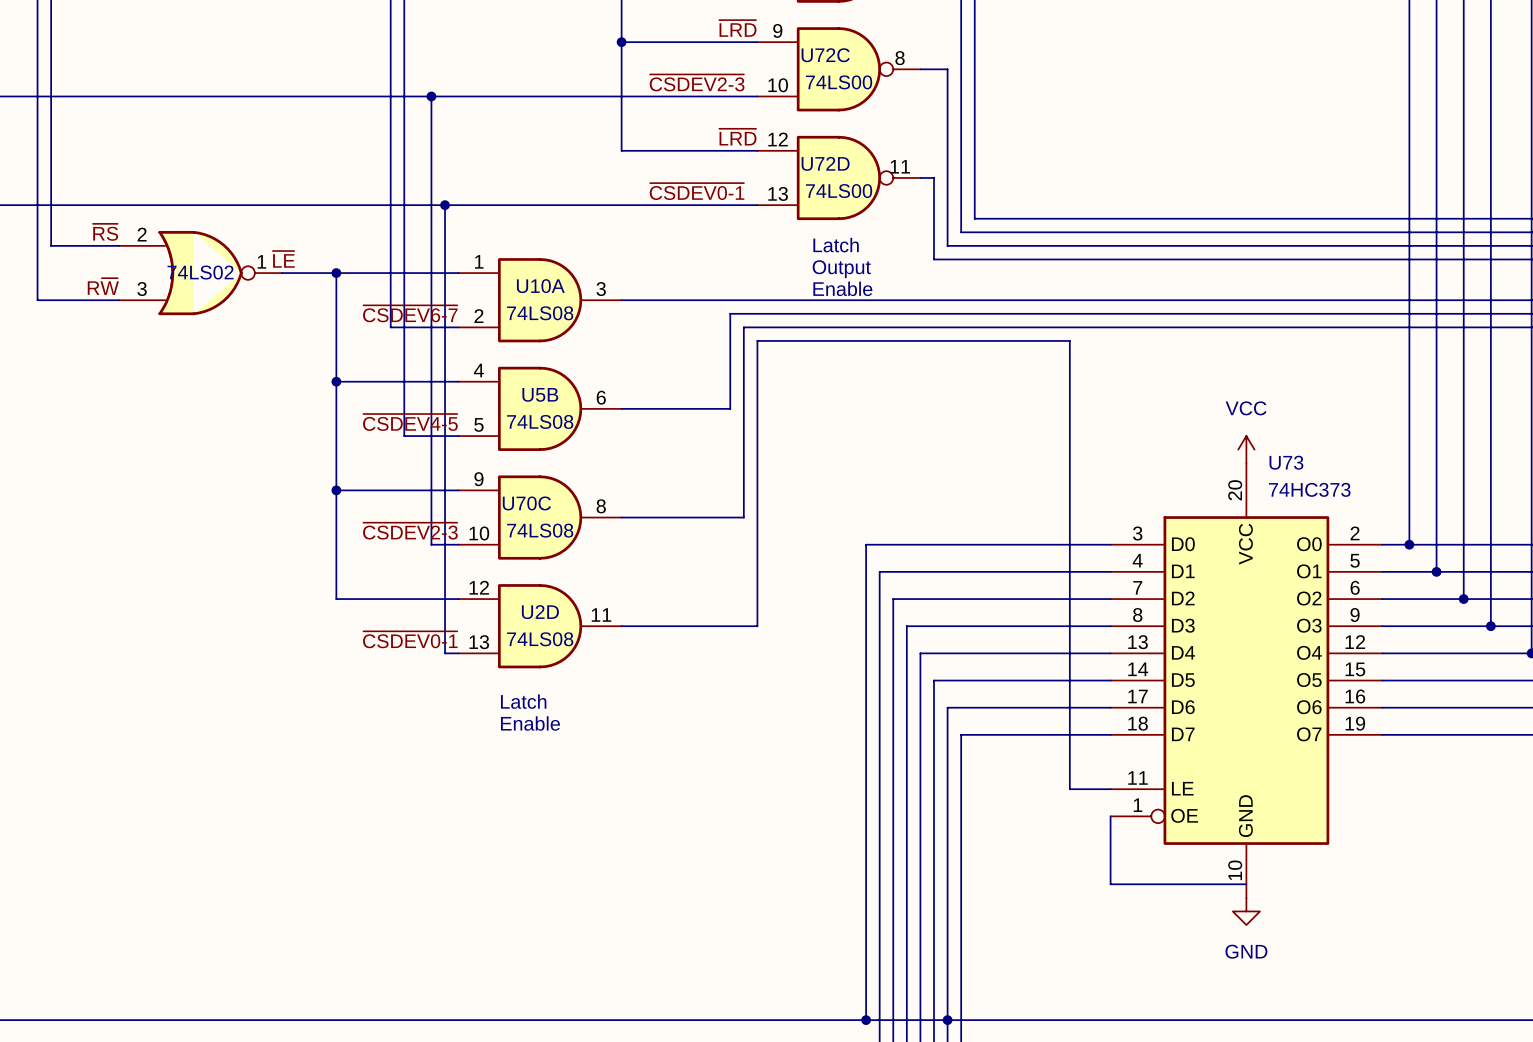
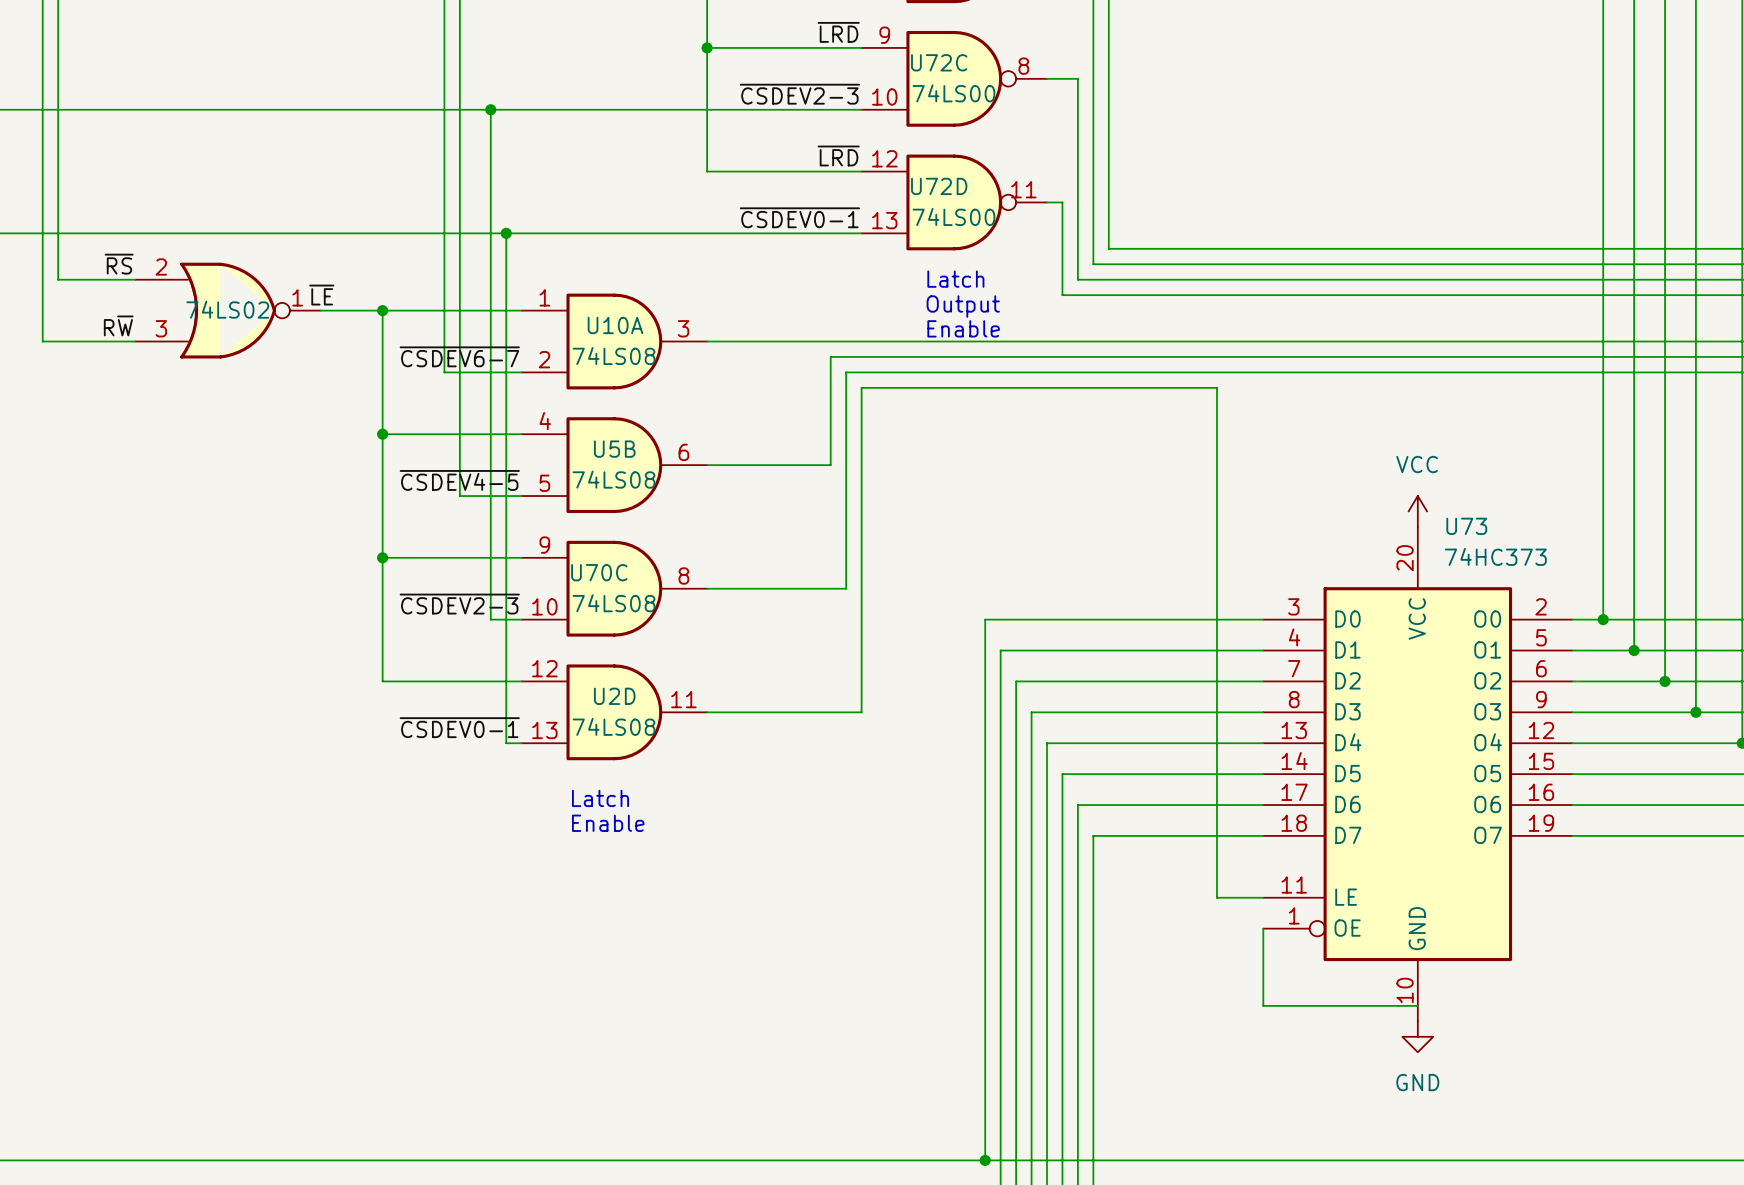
junction: (947, 1020) -> none

